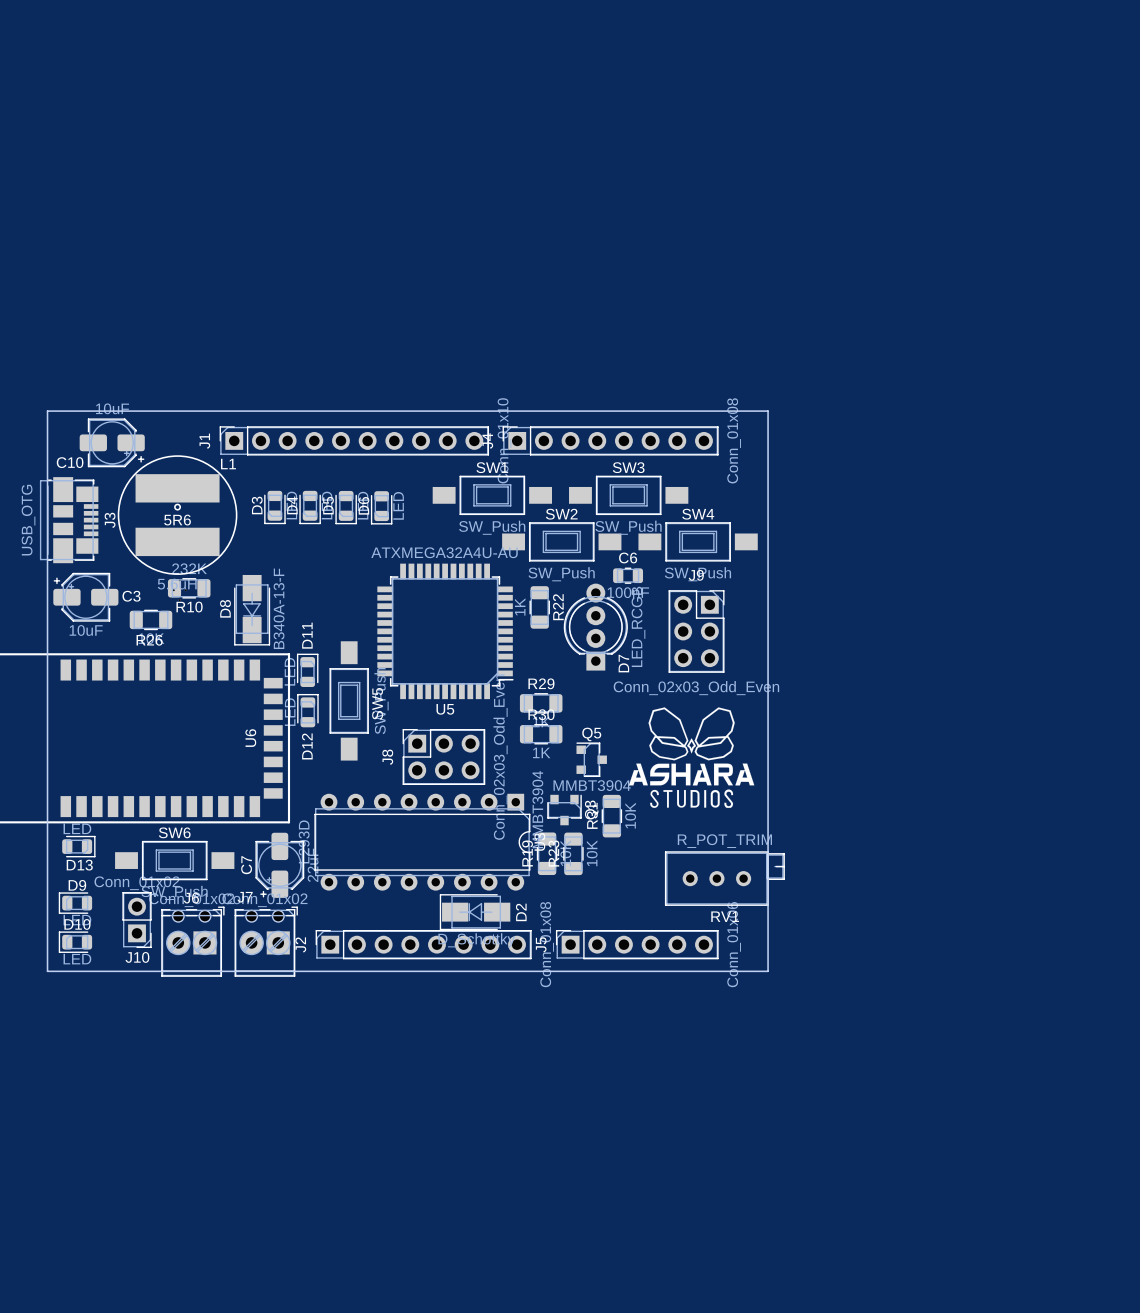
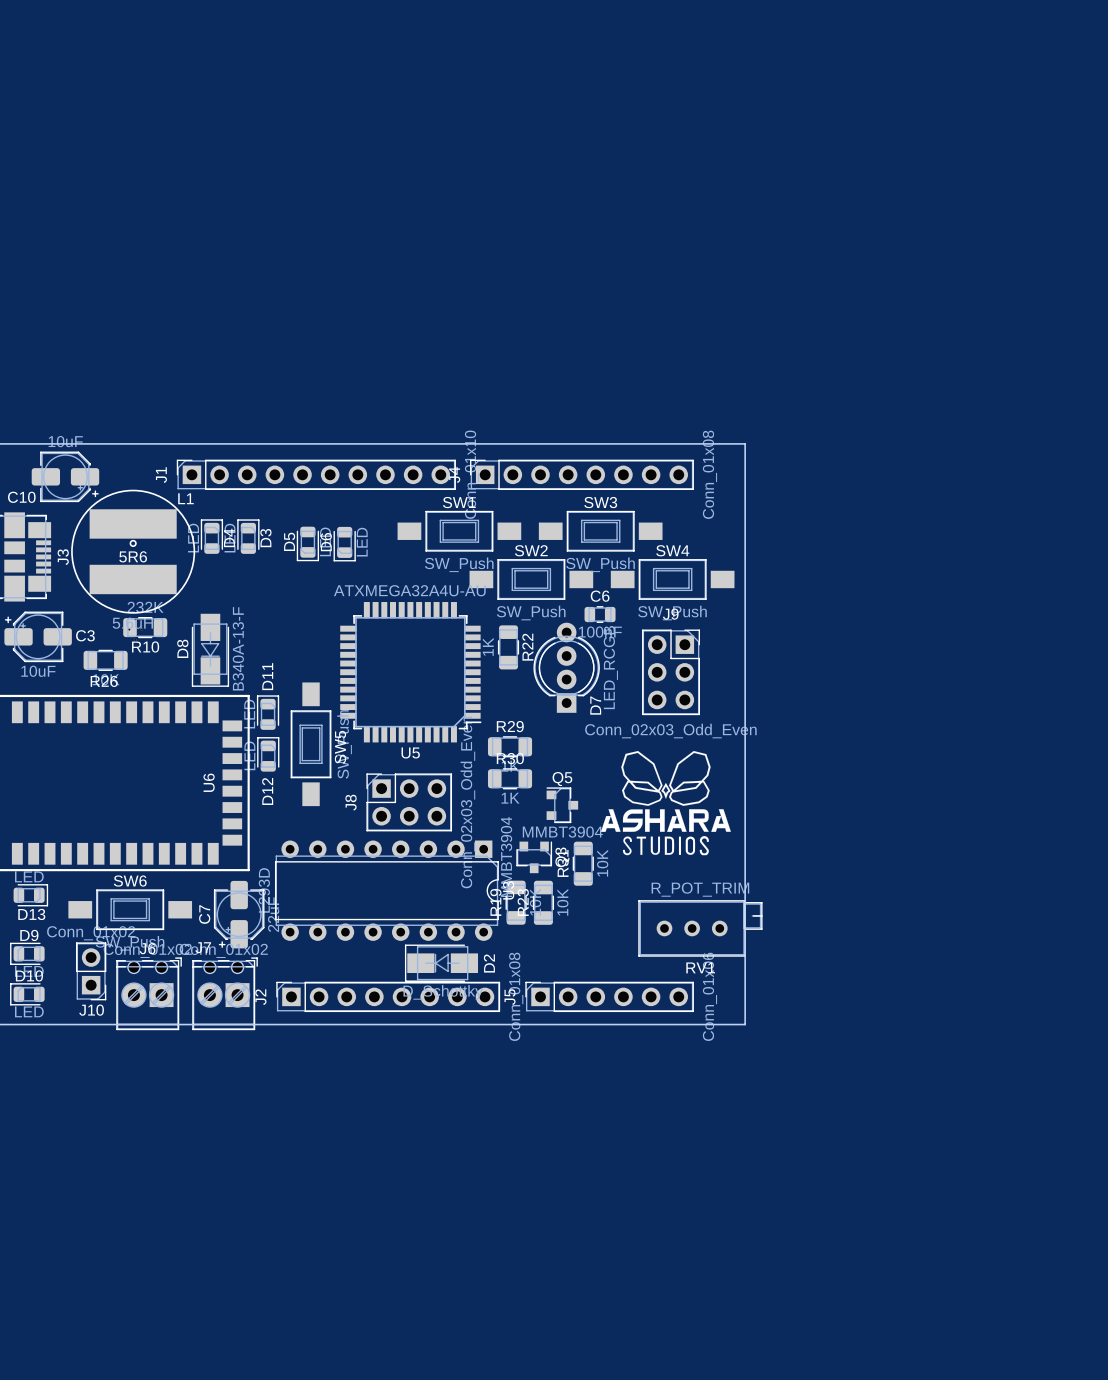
D3 rotation: 0° (274, 507) -> 180° (248, 536)
D4 rotation: 0° (310, 507) -> 180° (211, 536)
D4 position: (310, 507) -> (211, 536)

